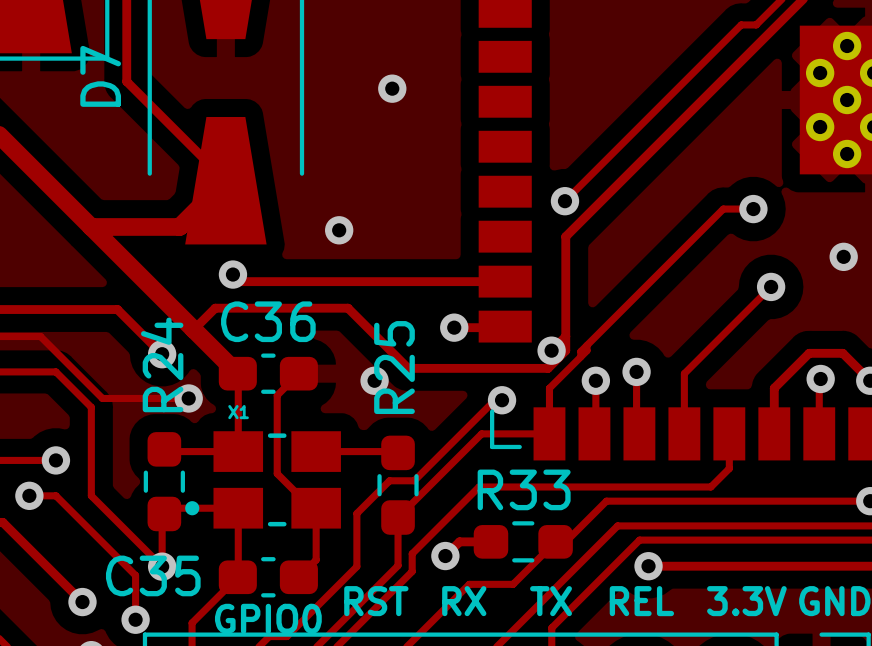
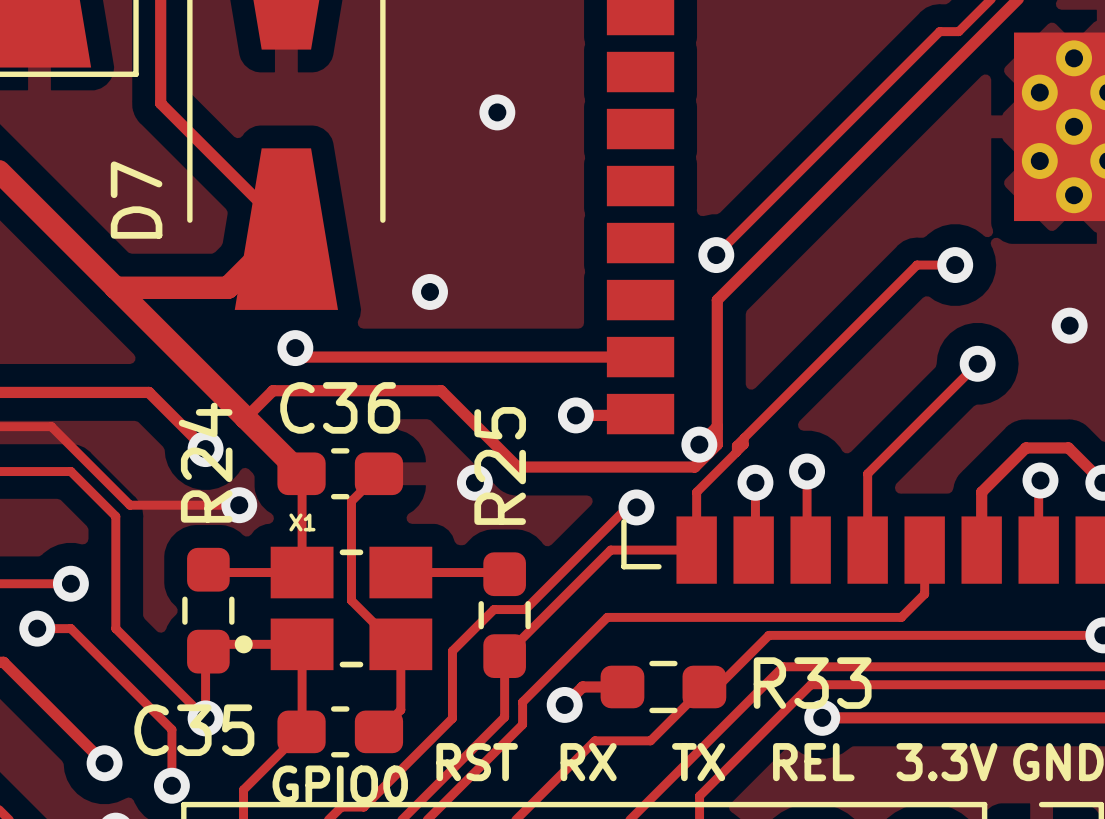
D7 name position: D7 (100, 76) -> D7 (136, 200)
R33 name position: R33 (524, 489) -> R33 (812, 683)

